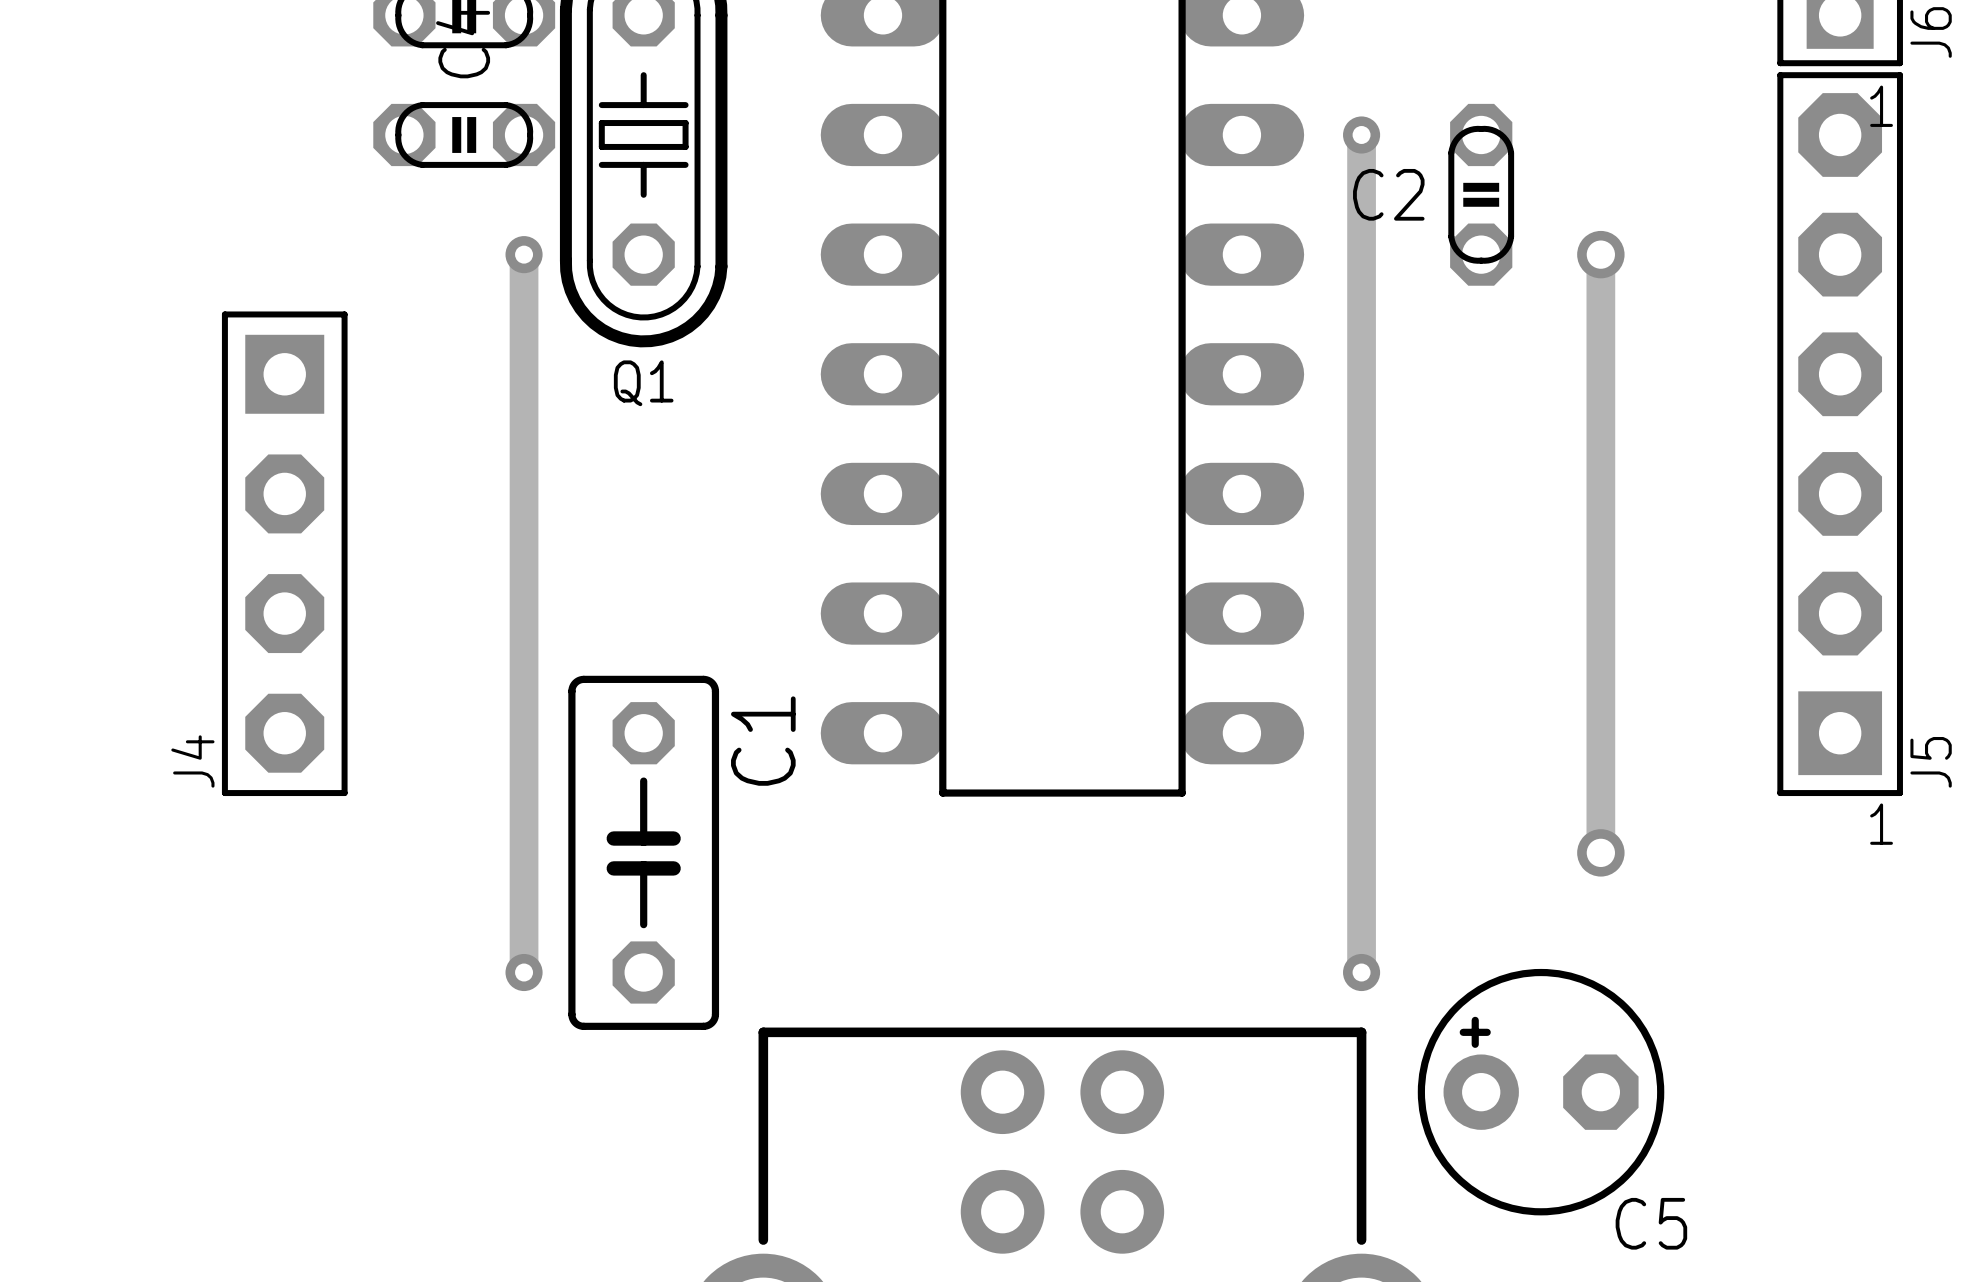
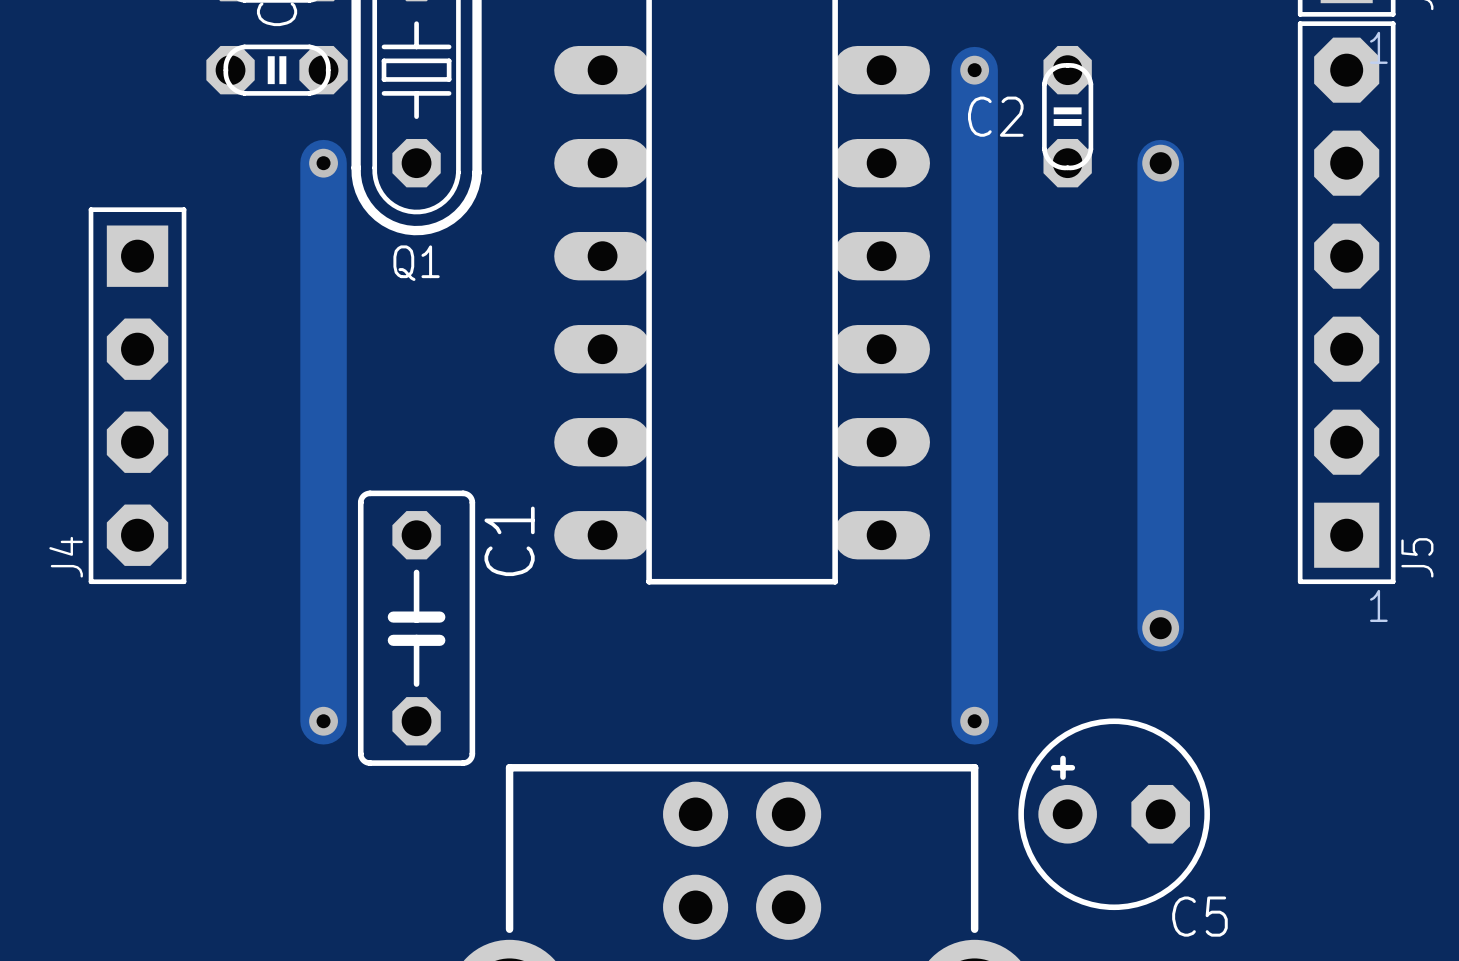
track width: thin (1361, 134) (1361, 972) -> thick (974, 70) (974, 721)
track width: thin (524, 254) (524, 972) -> thick (323, 163) (323, 721)
track width: thin (1600, 254) (1600, 852) -> thick (1160, 163) (1160, 628)

